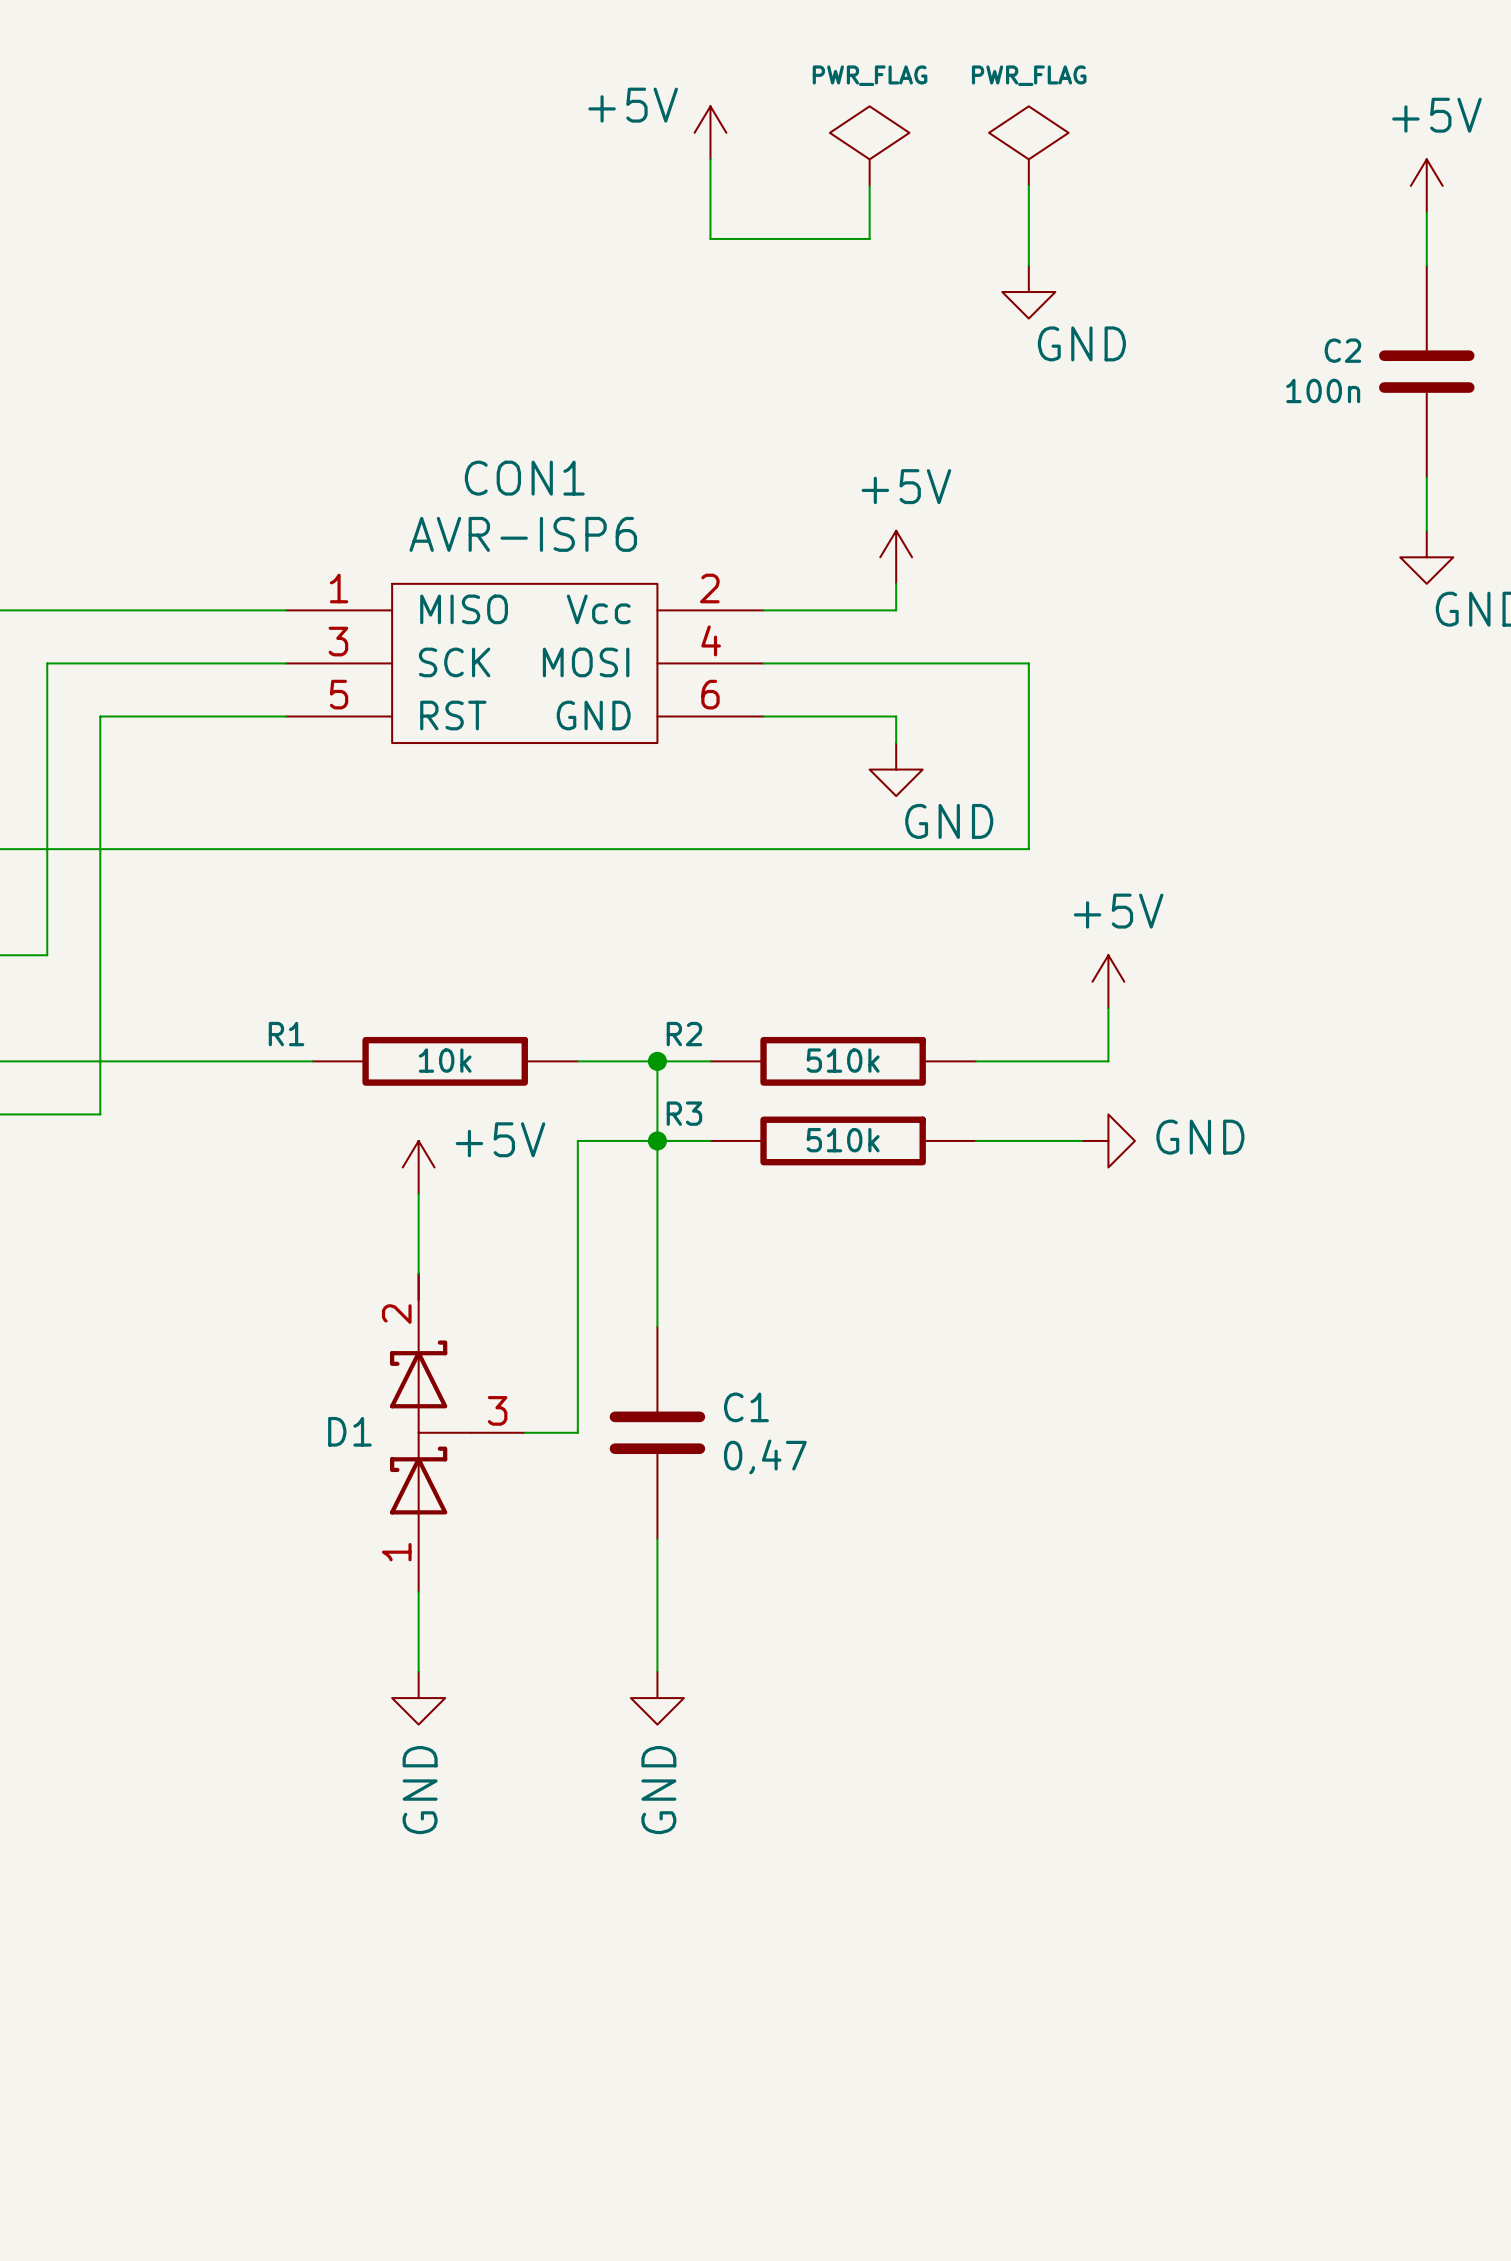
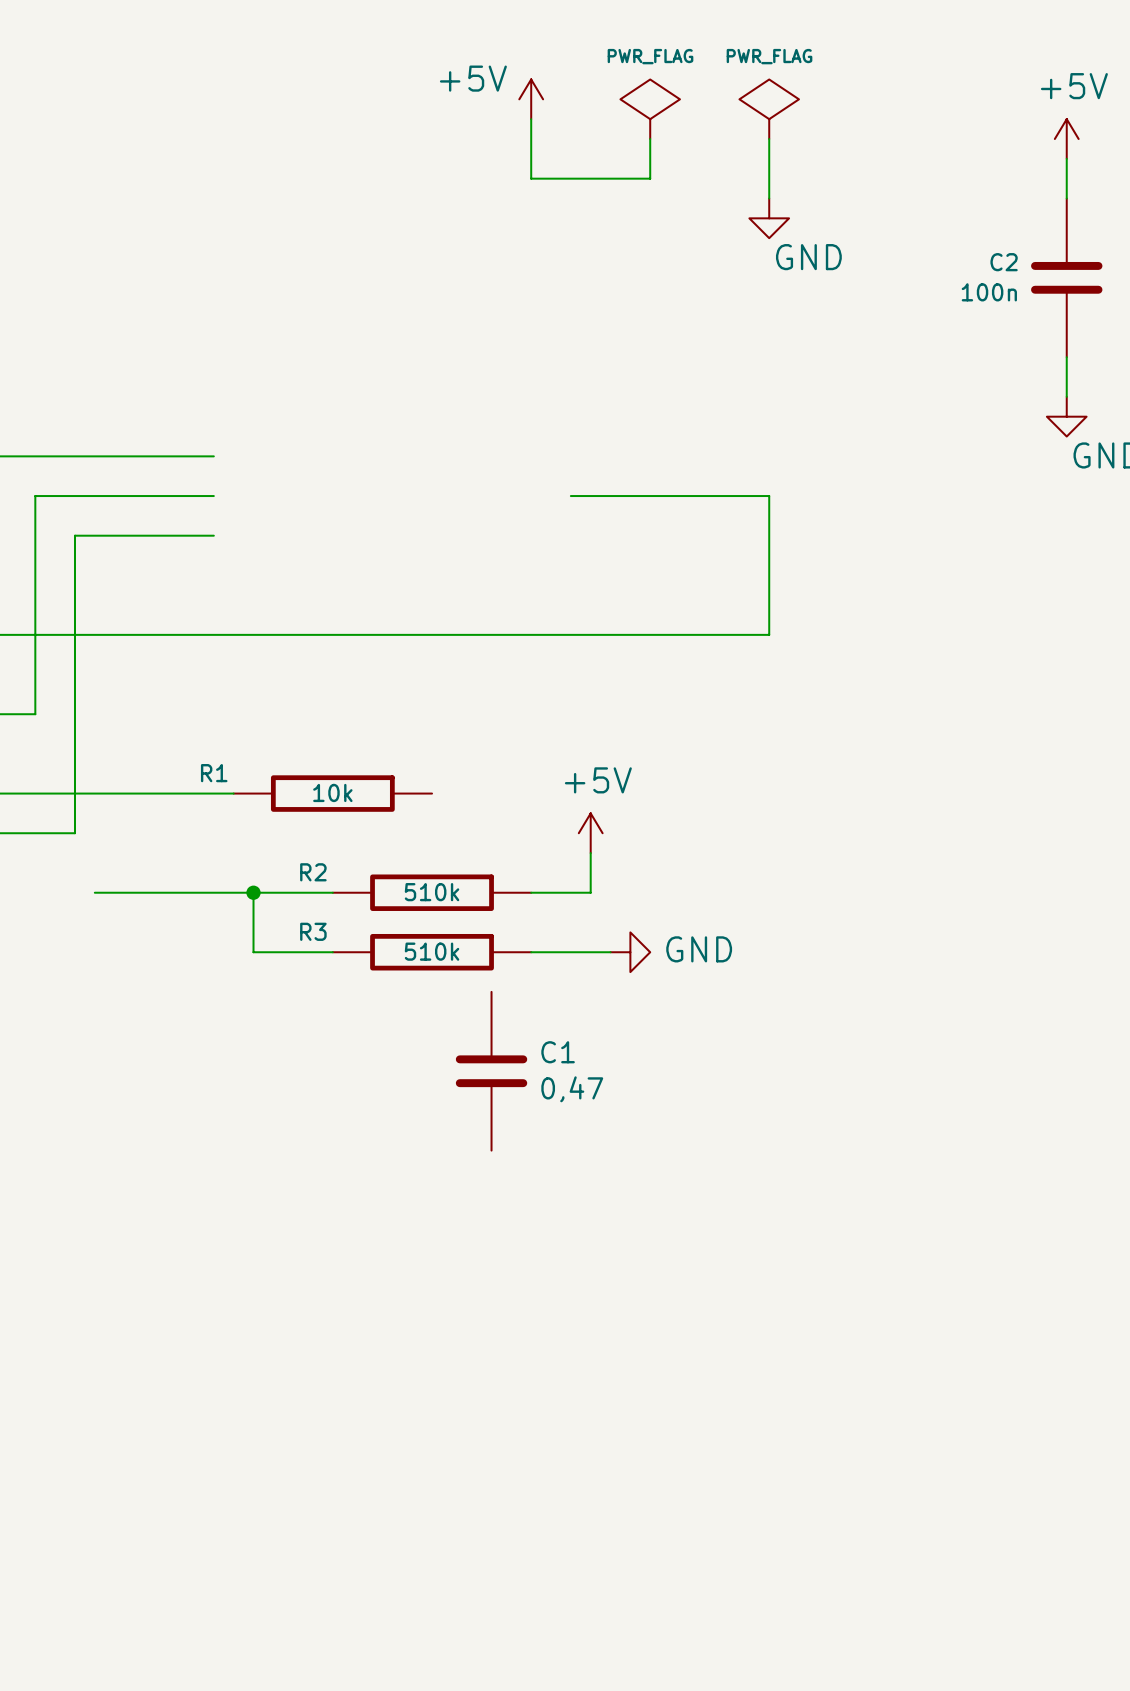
power symbol: +5V (896, 557) -> none
wire: (896, 583) (896, 610) (763, 610) -> none
CON1: AVR-ISP6 (524, 663) -> none
wire: (763, 716) (896, 716) (896, 743) -> none
power symbol: GND (896, 769) -> none
power symbol: +5V (1108, 981) -> none
wire: (1108, 1008) (1108, 1061) (975, 1061) -> none
wire: (577, 1061) (710, 1061) -> none
wire: (657, 1061) (657, 1326) -> none
junction: (657, 1061) -> none
R2 position: (843, 1061) -> (432, 892)
power symbol: none -> +5V (590, 833)
junction: (657, 1140) -> none
wire: (710, 1140) (577, 1140) (577, 1432) (524, 1432) -> none
wire: none -> (590, 853) (590, 892) (531, 892)
R3 position: (843, 1140) -> (432, 952)
wire: (975, 1140) (1081, 1140) -> (531, 952) (610, 952)
power symbol: GND (1108, 1140) -> none
power symbol: +5V (418, 1167) -> none
wire: none -> (94, 892) (332, 892)
wire: none -> (253, 892) (253, 952) (332, 952)
junction: none -> (253, 892)
wire: (418, 1194) (418, 1273) -> none
power symbol: none -> GND (630, 952)
D1: (457, 1432) -> none
wire: (657, 1538) (657, 1671) -> none
wire: (418, 1591) (418, 1671) -> none
power symbol: GND (418, 1698) -> none
power symbol: GND (657, 1698) -> none

